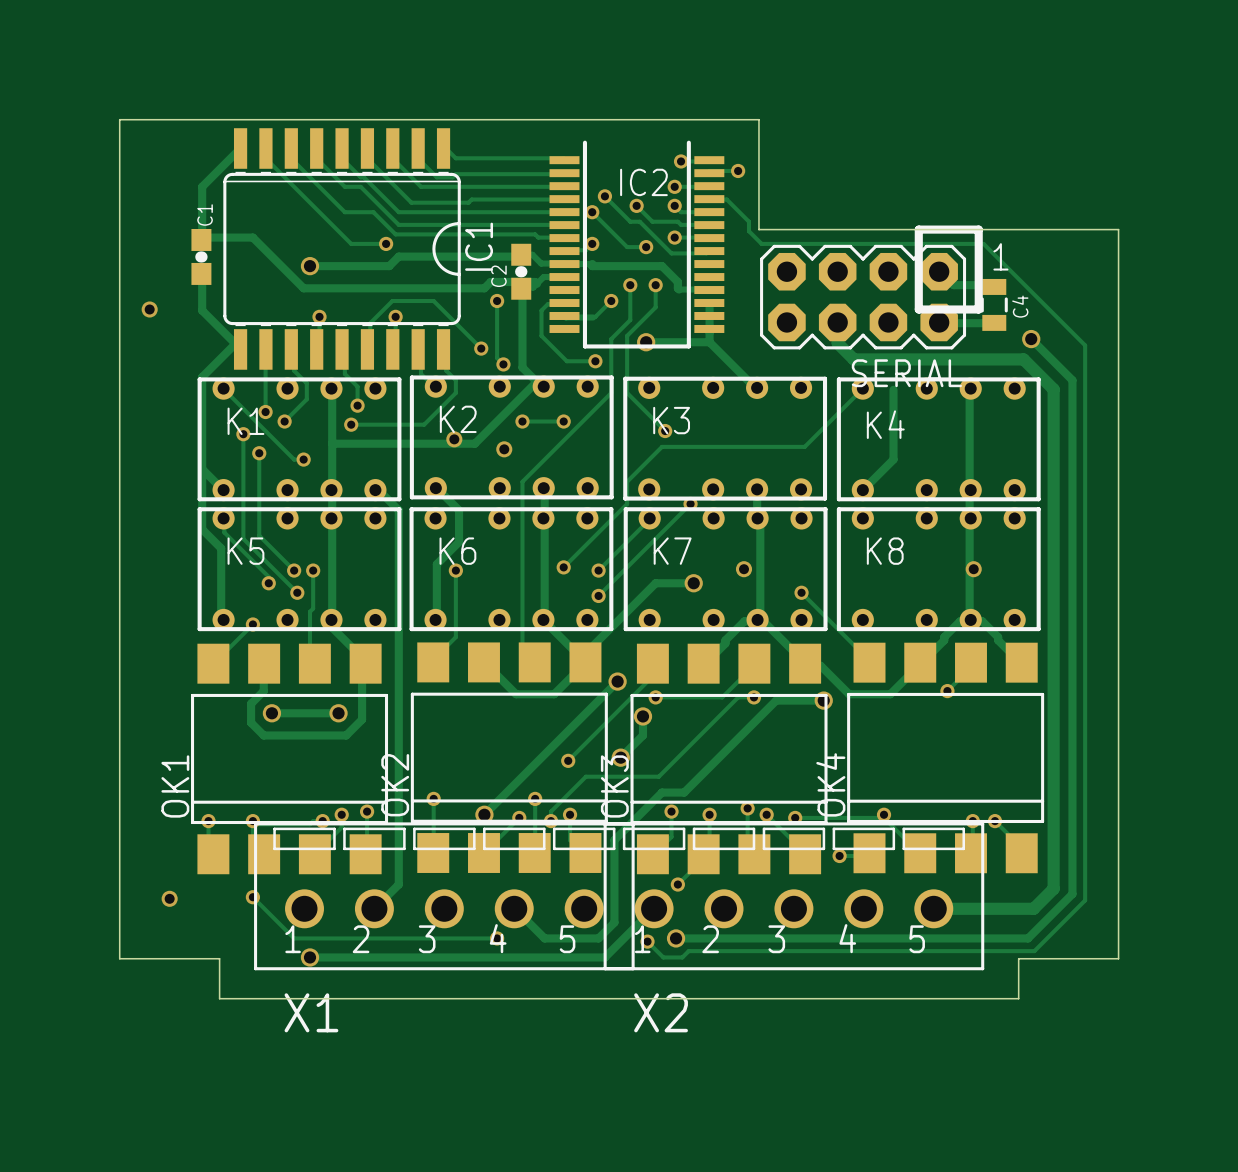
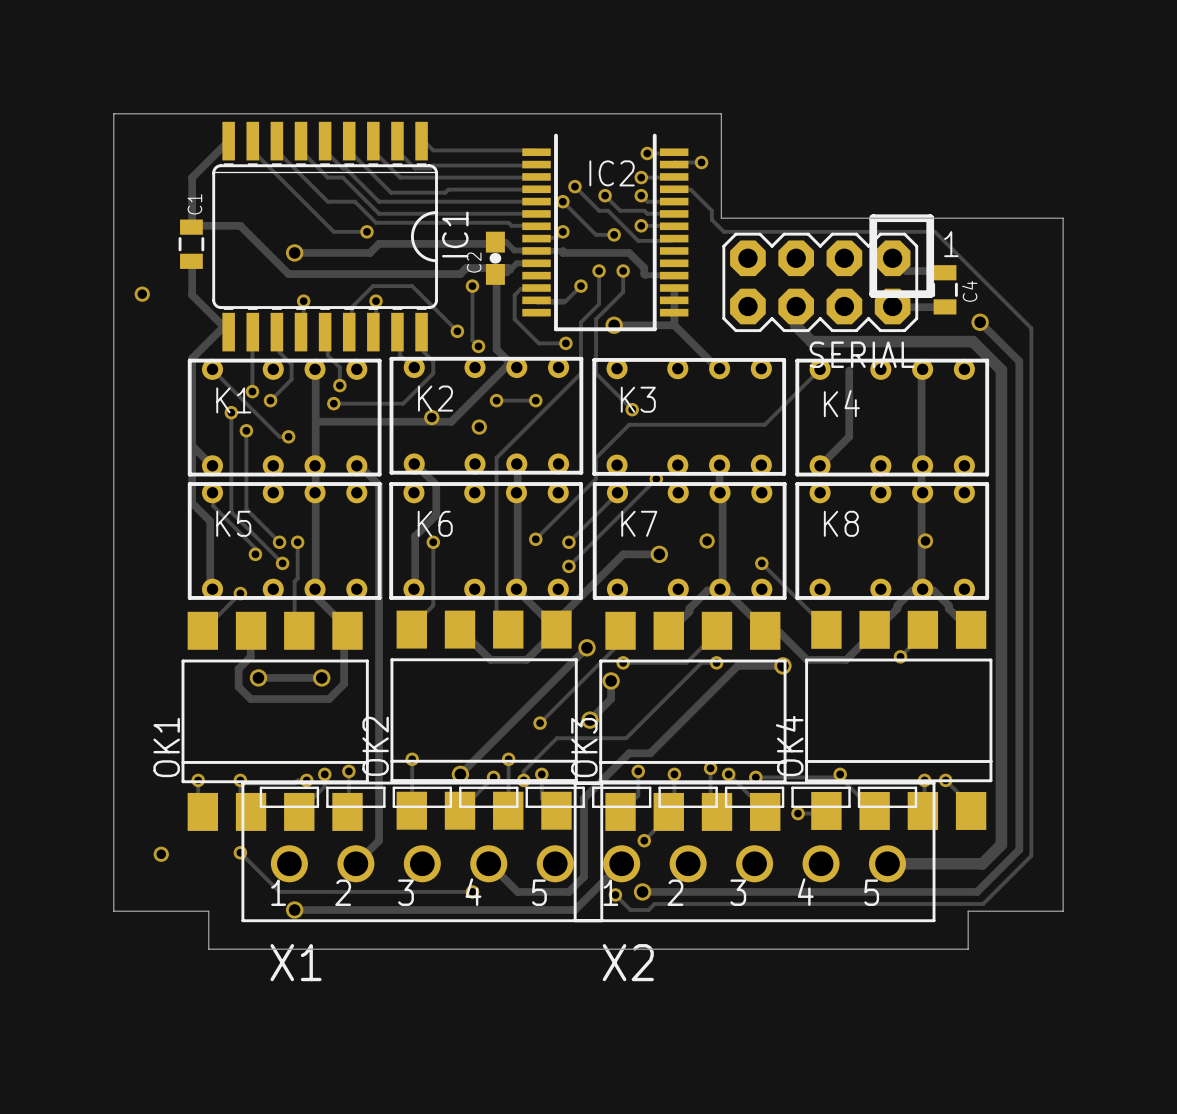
C1 footprint: [191, 228, 212, 285] -> [178, 219, 205, 269]

